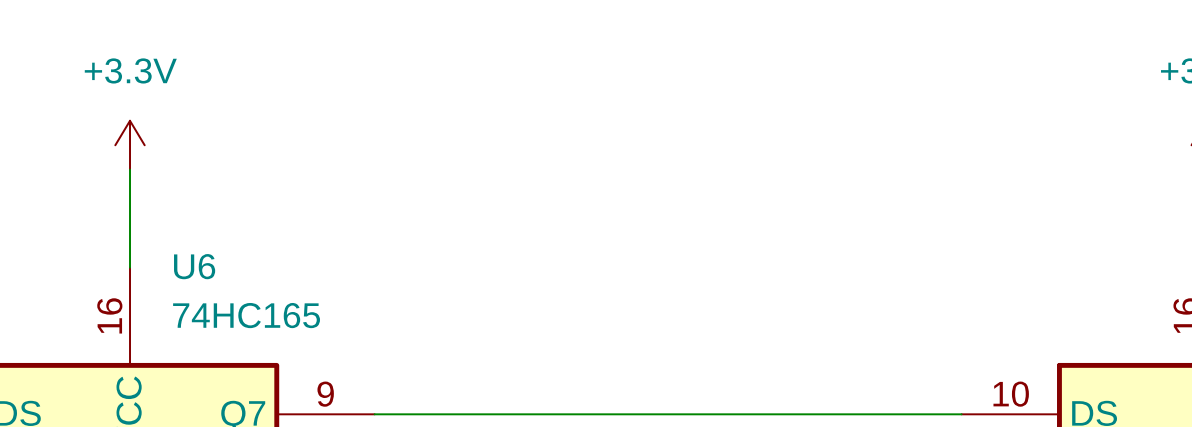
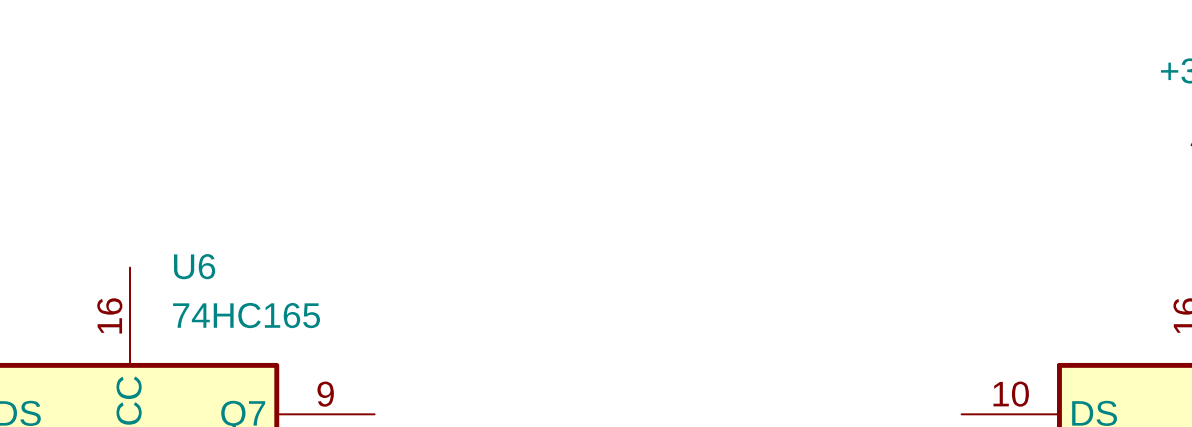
power symbol: +3.3V (130, 145) -> none
wire: (130, 169) (130, 267) -> none
wire: (374, 414) (961, 414) -> none

